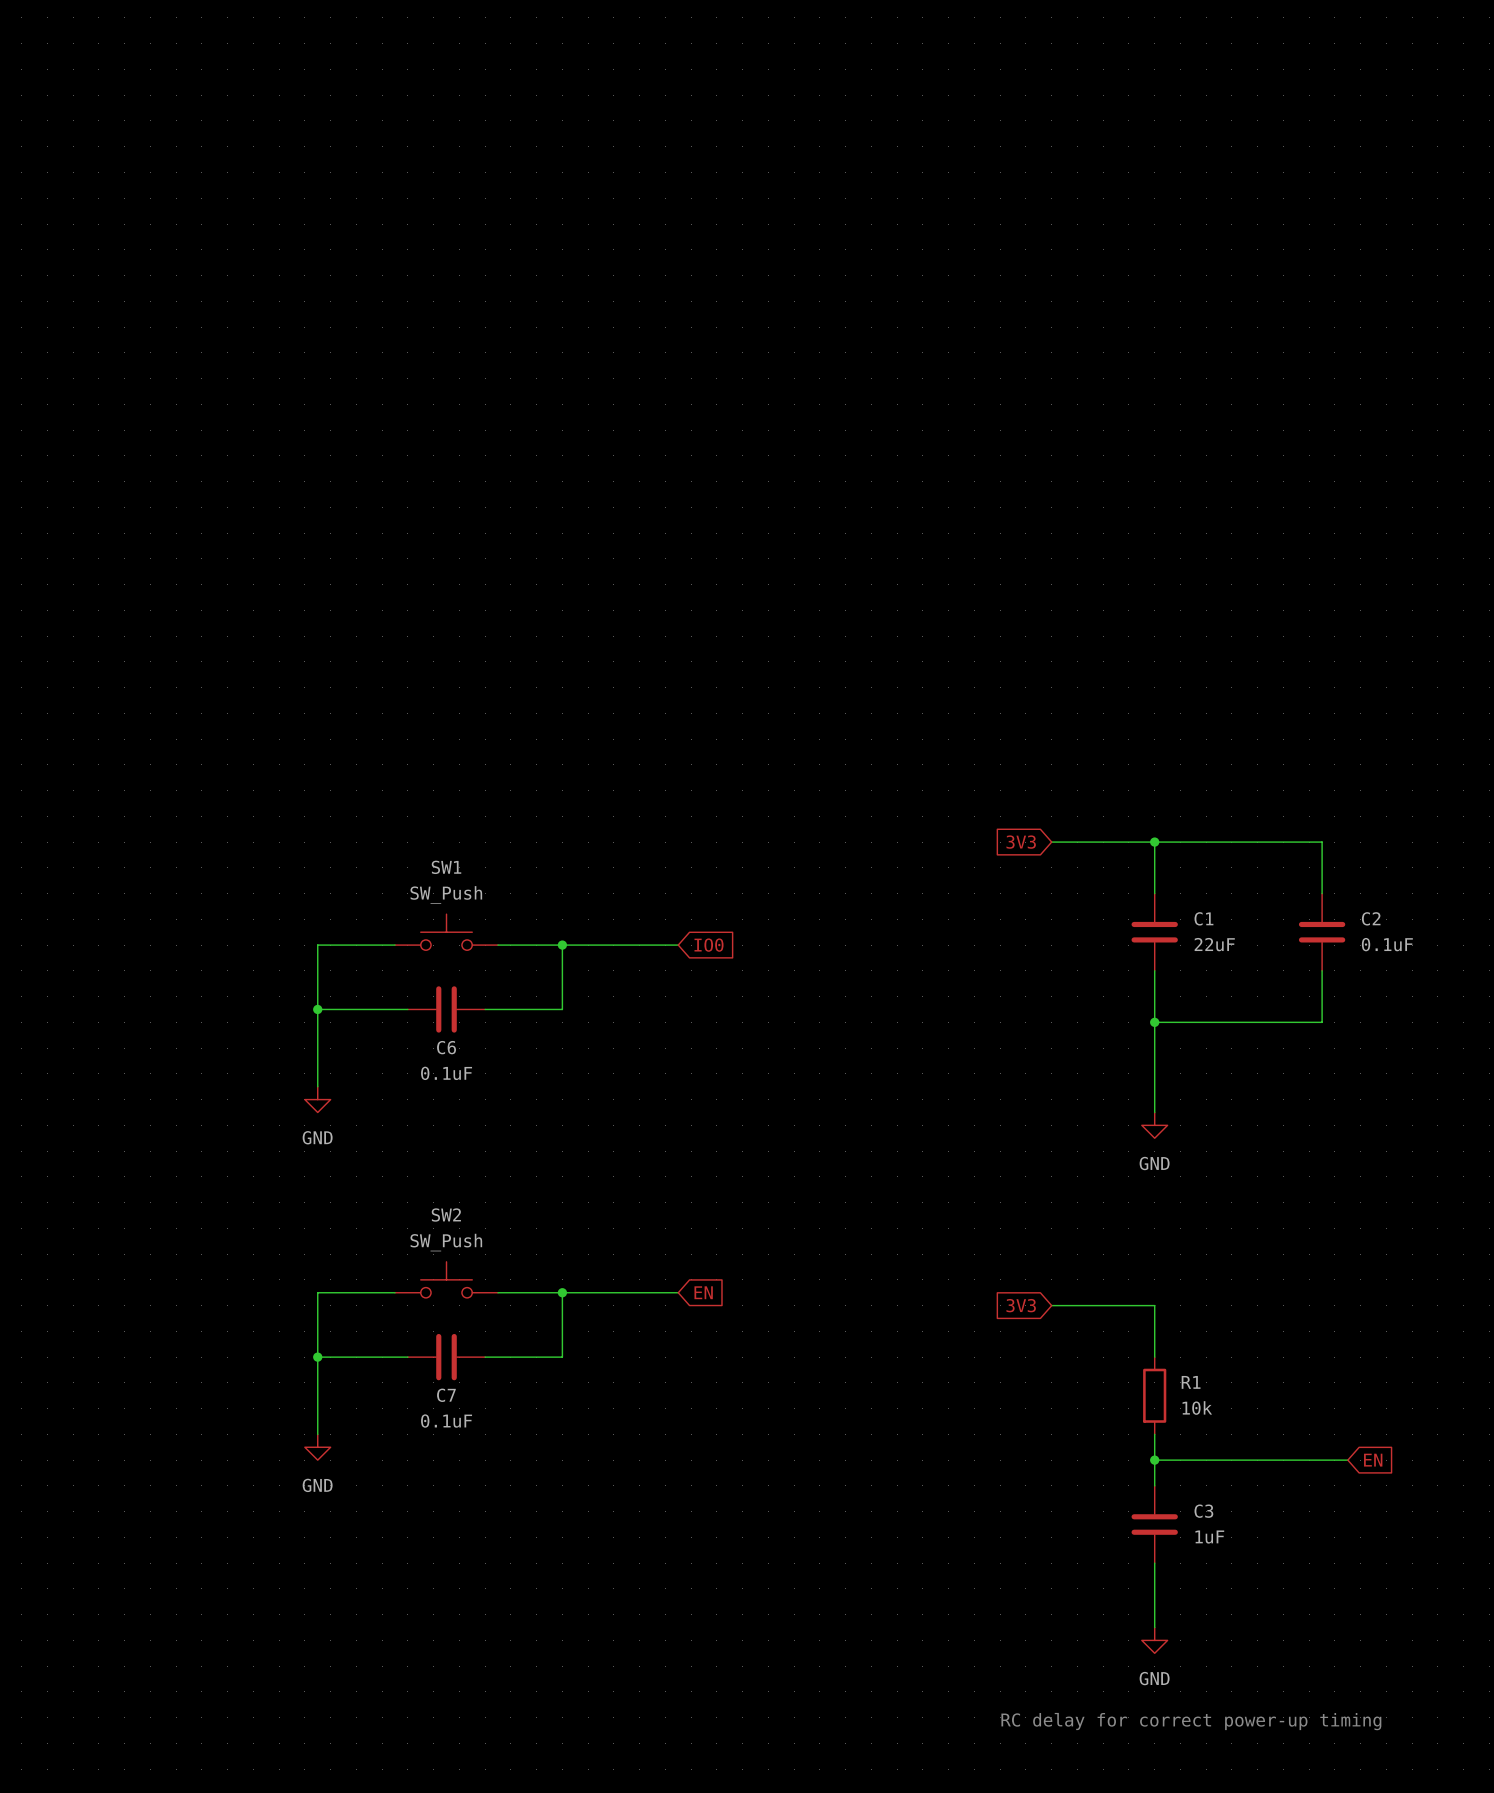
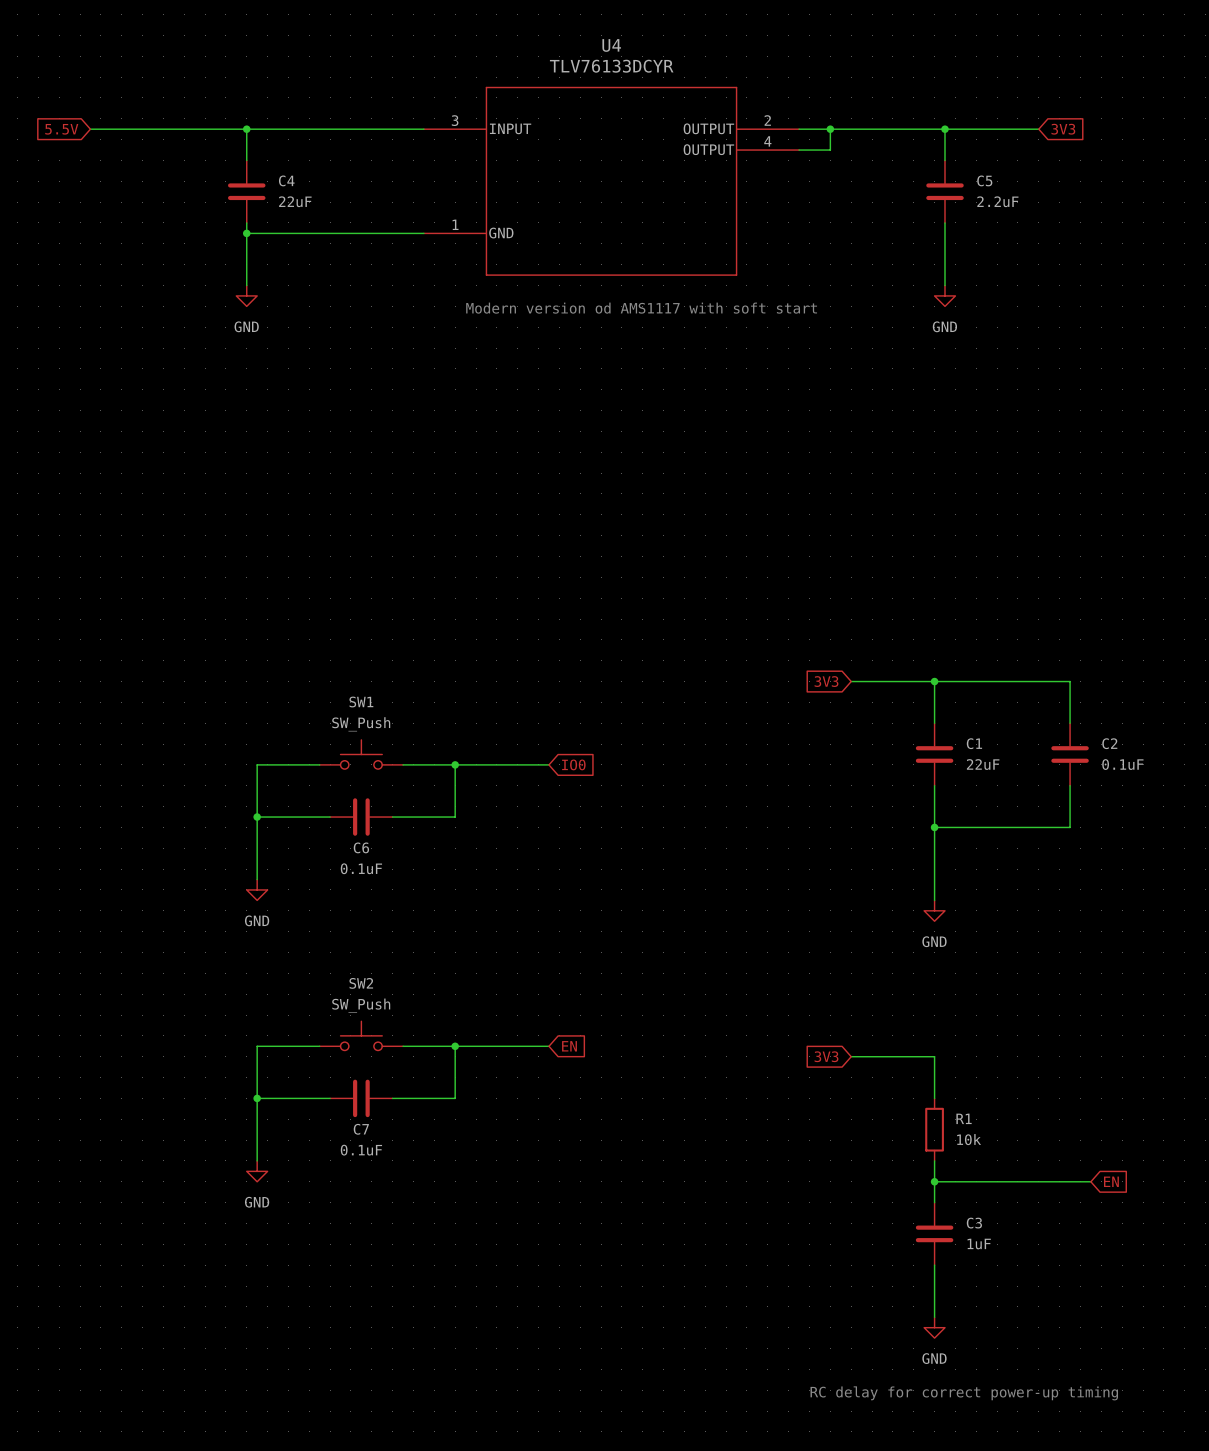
global label: none -> 5.5V (61, 129)
wire: none -> (90, 129) (423, 129)
wire: none -> (246, 129) (246, 160)
junction: none -> (246, 129)
wire: none -> (799, 129) (1038, 129)
wire: none -> (830, 129) (830, 150) (799, 150)
junction: none -> (830, 129)
wire: none -> (944, 129) (944, 160)
junction: none -> (944, 129)
global label: none -> 3V3 (1063, 129)
U4: none -> TLV76133DCYR (611, 181)
C4: none -> 22uF (246, 191)
C5: none -> 2.2uF (944, 191)
wire: none -> (246, 222) (246, 285)
wire: none -> (944, 222) (944, 285)
wire: none -> (246, 233) (423, 233)
junction: none -> (246, 233)
power symbol: none -> GND (246, 295)
power symbol: none -> GND (944, 295)
text: none -> Modern version od AMS1117 with soft start (641, 308)

